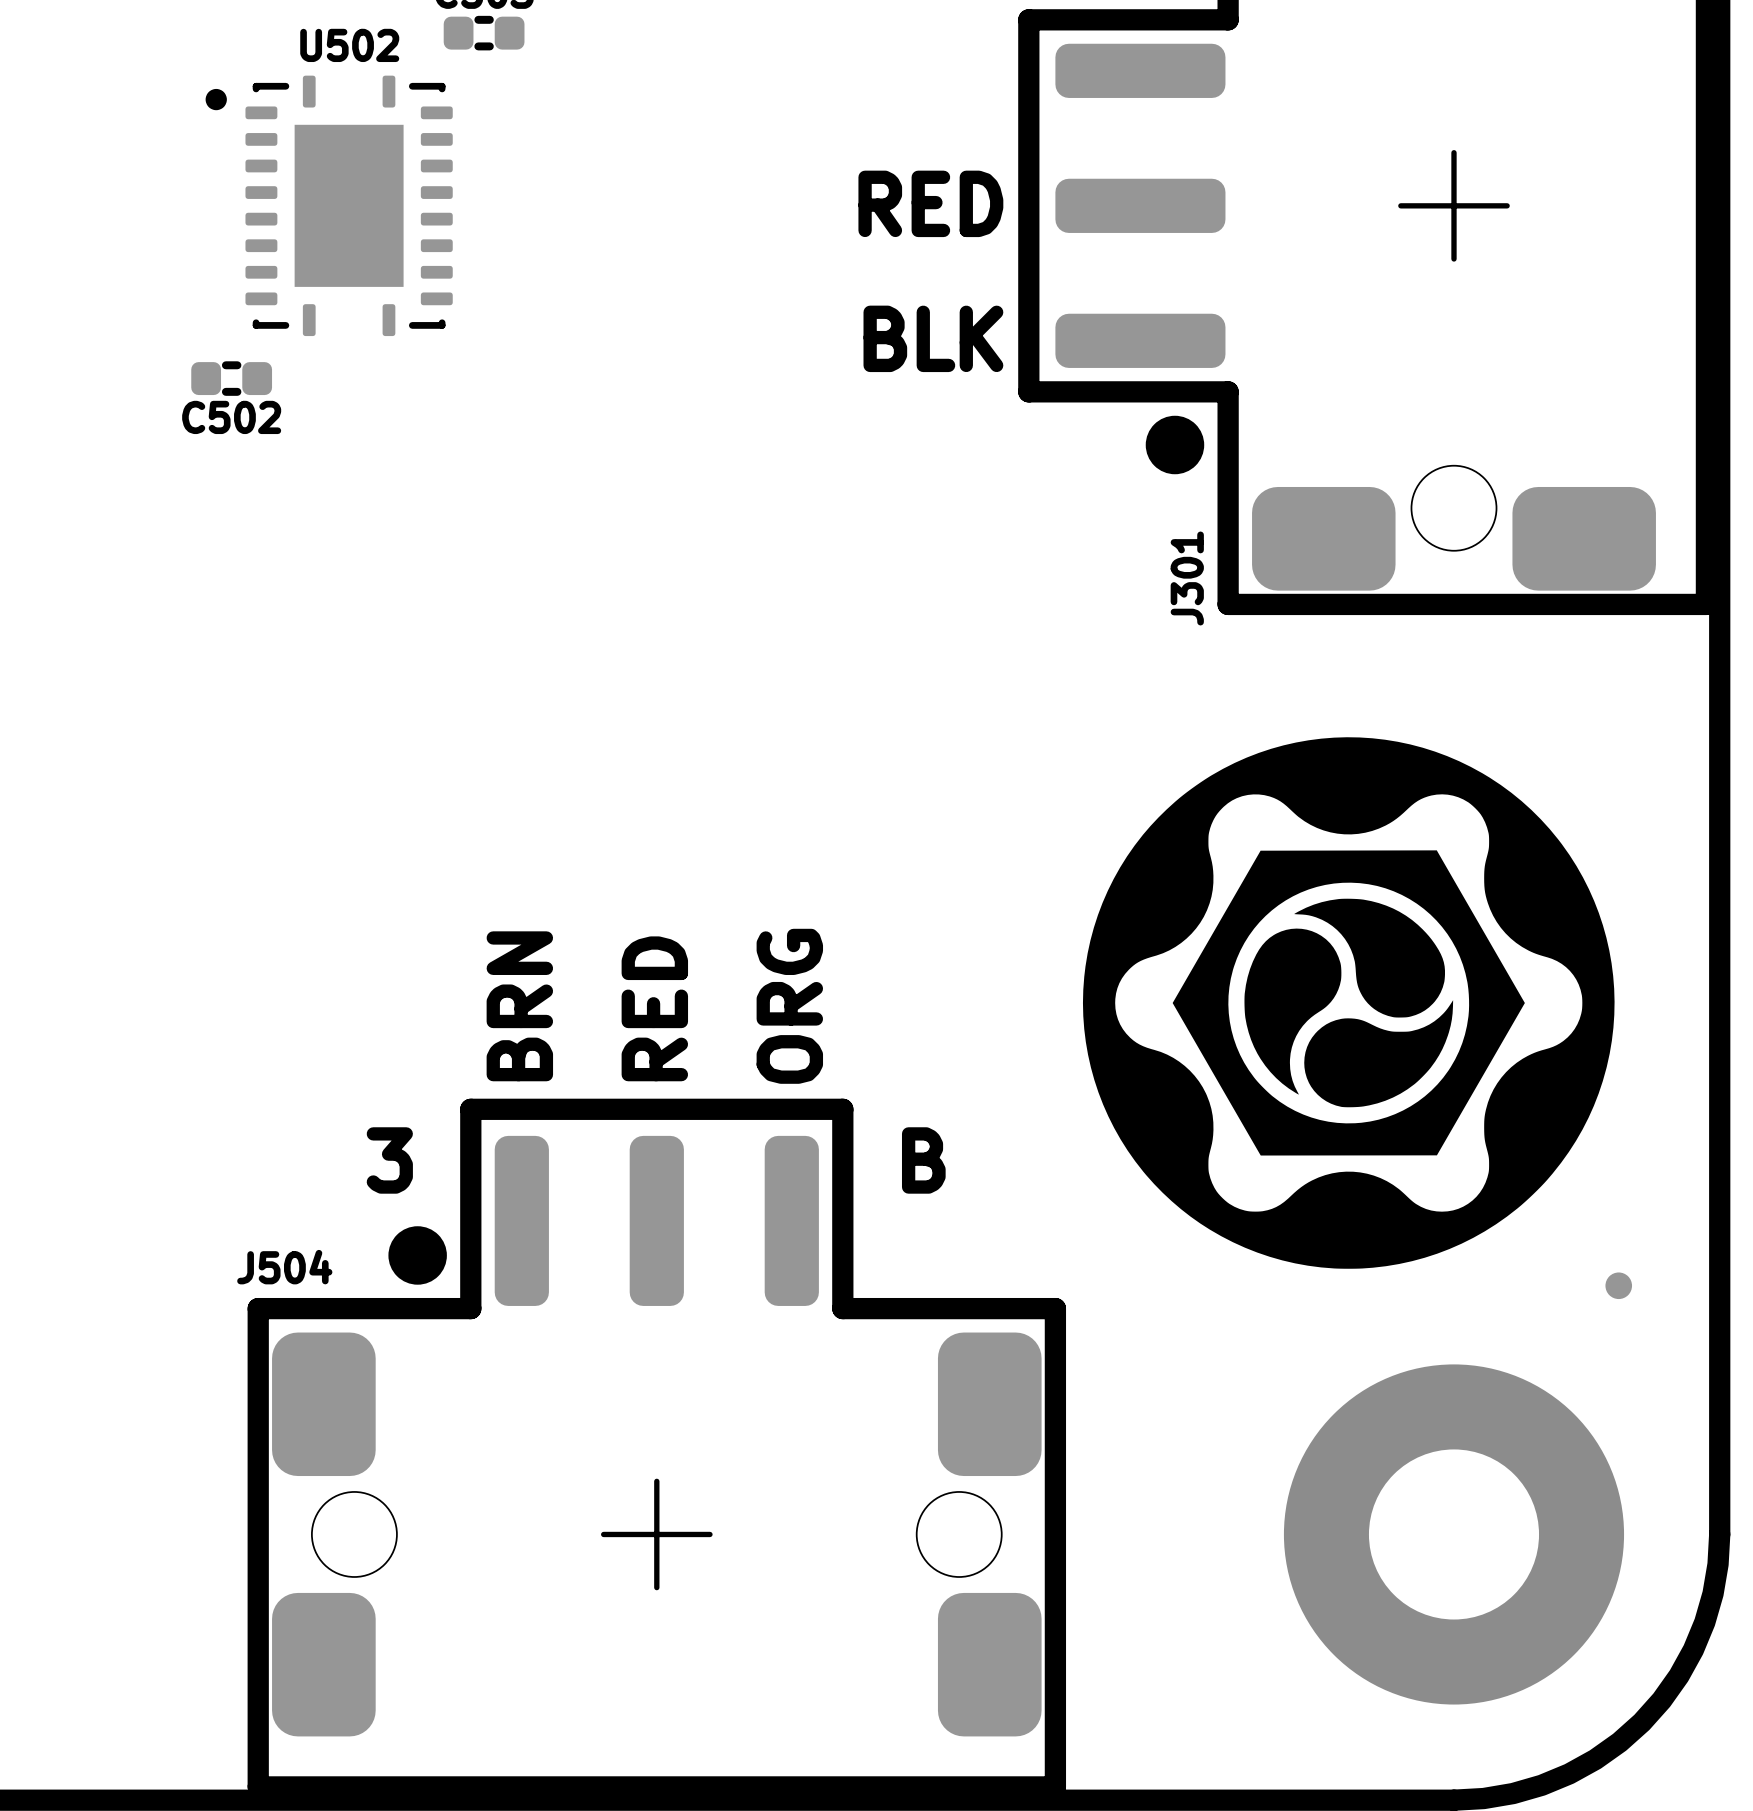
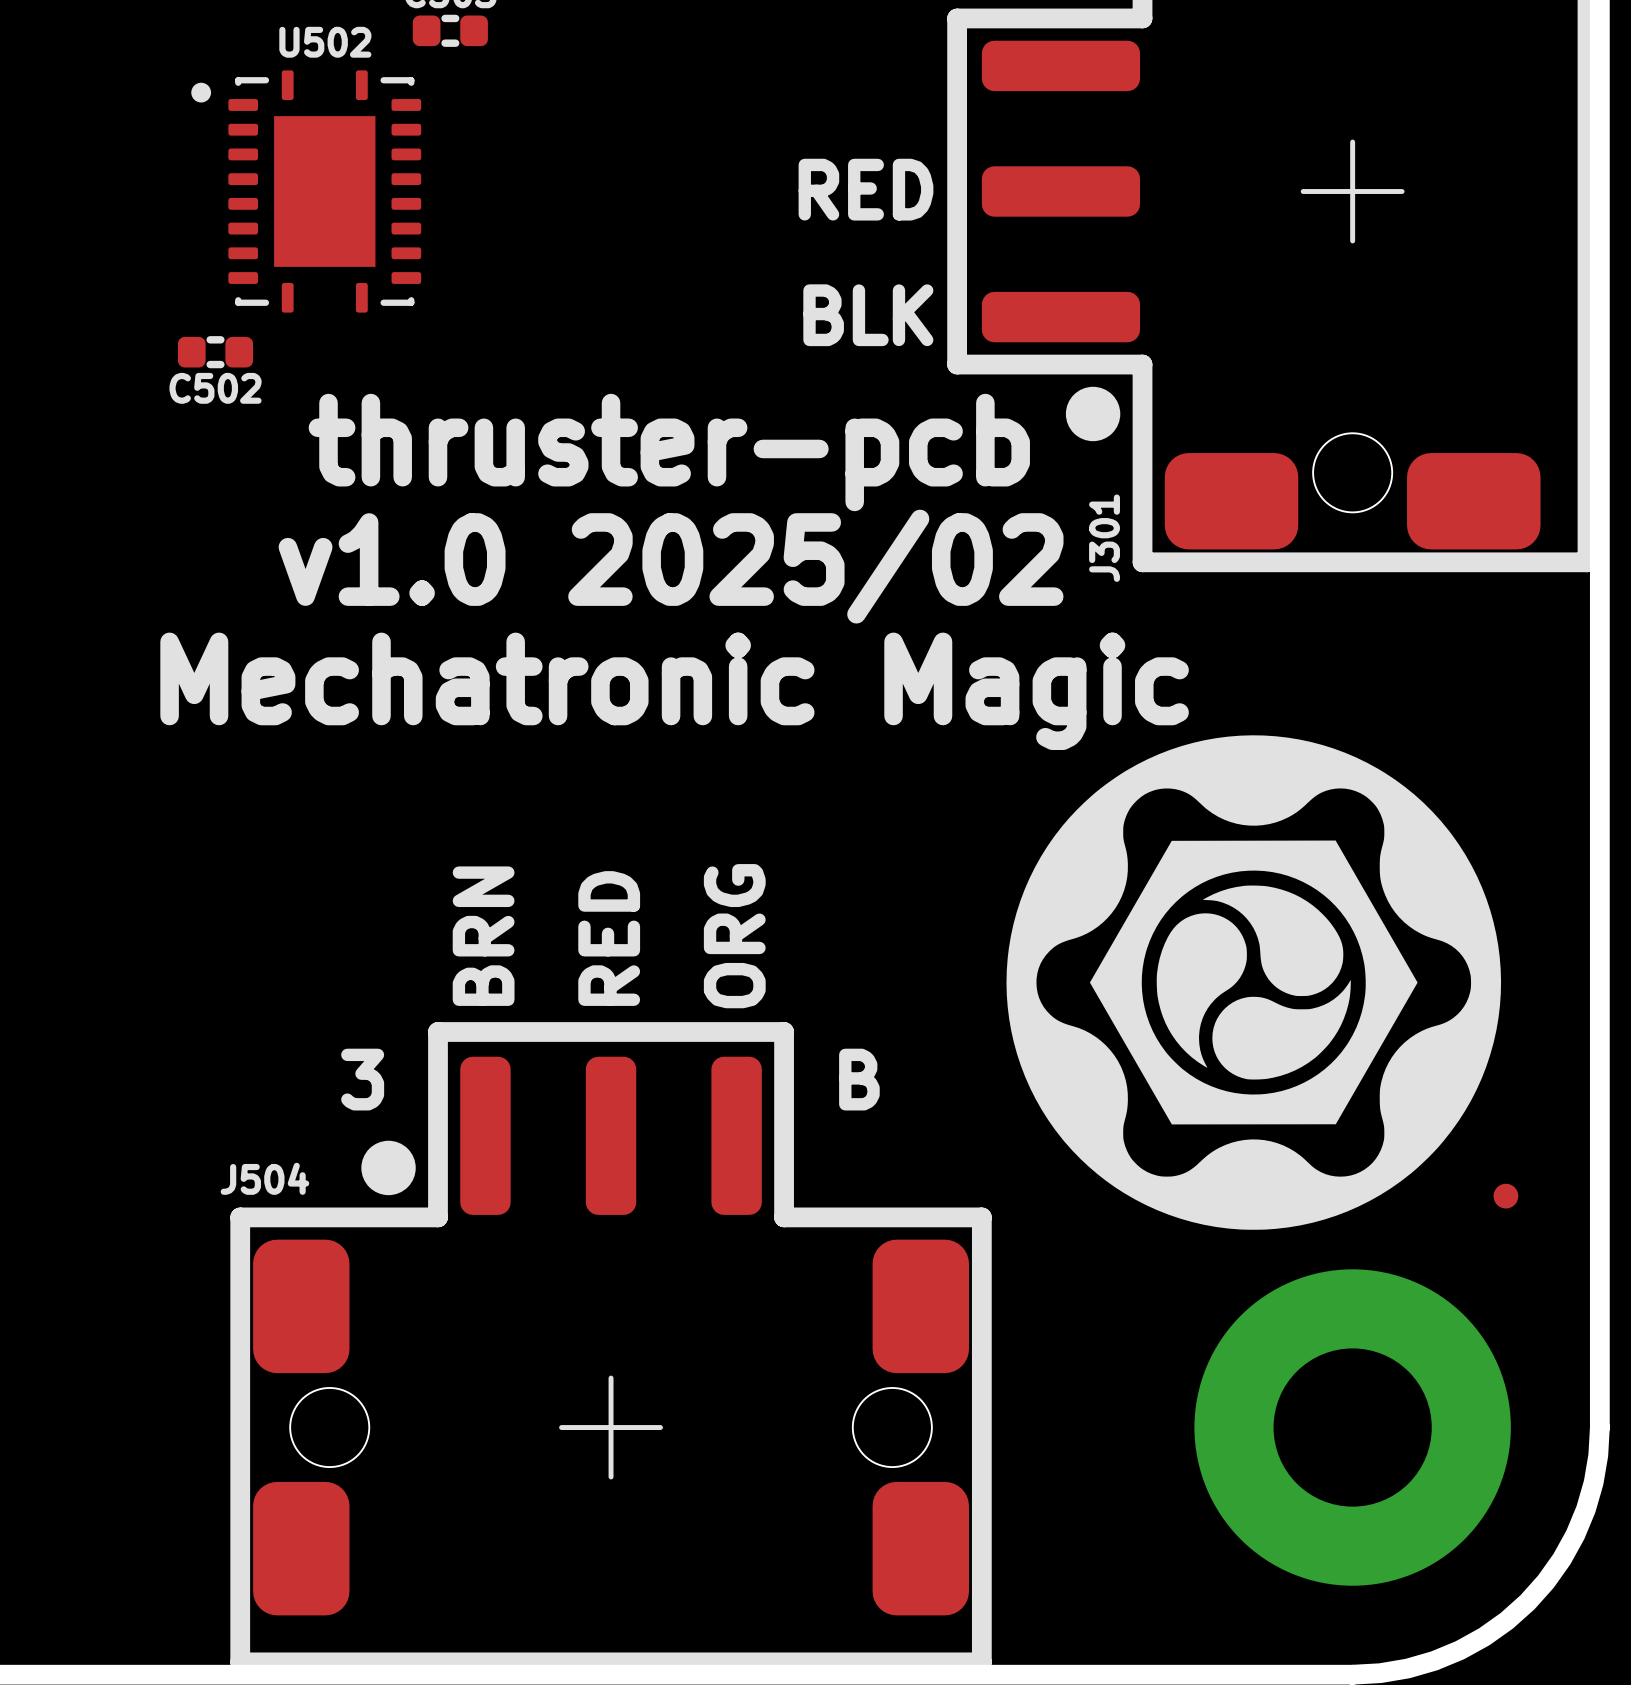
text: none -> thruster-pcb (669, 452)
text: none -> v1.0 2025/02 (671, 566)
text: none -> Mechatronic Magic (674, 691)
drawing position: (1348, 1003) -> (1253, 982)

